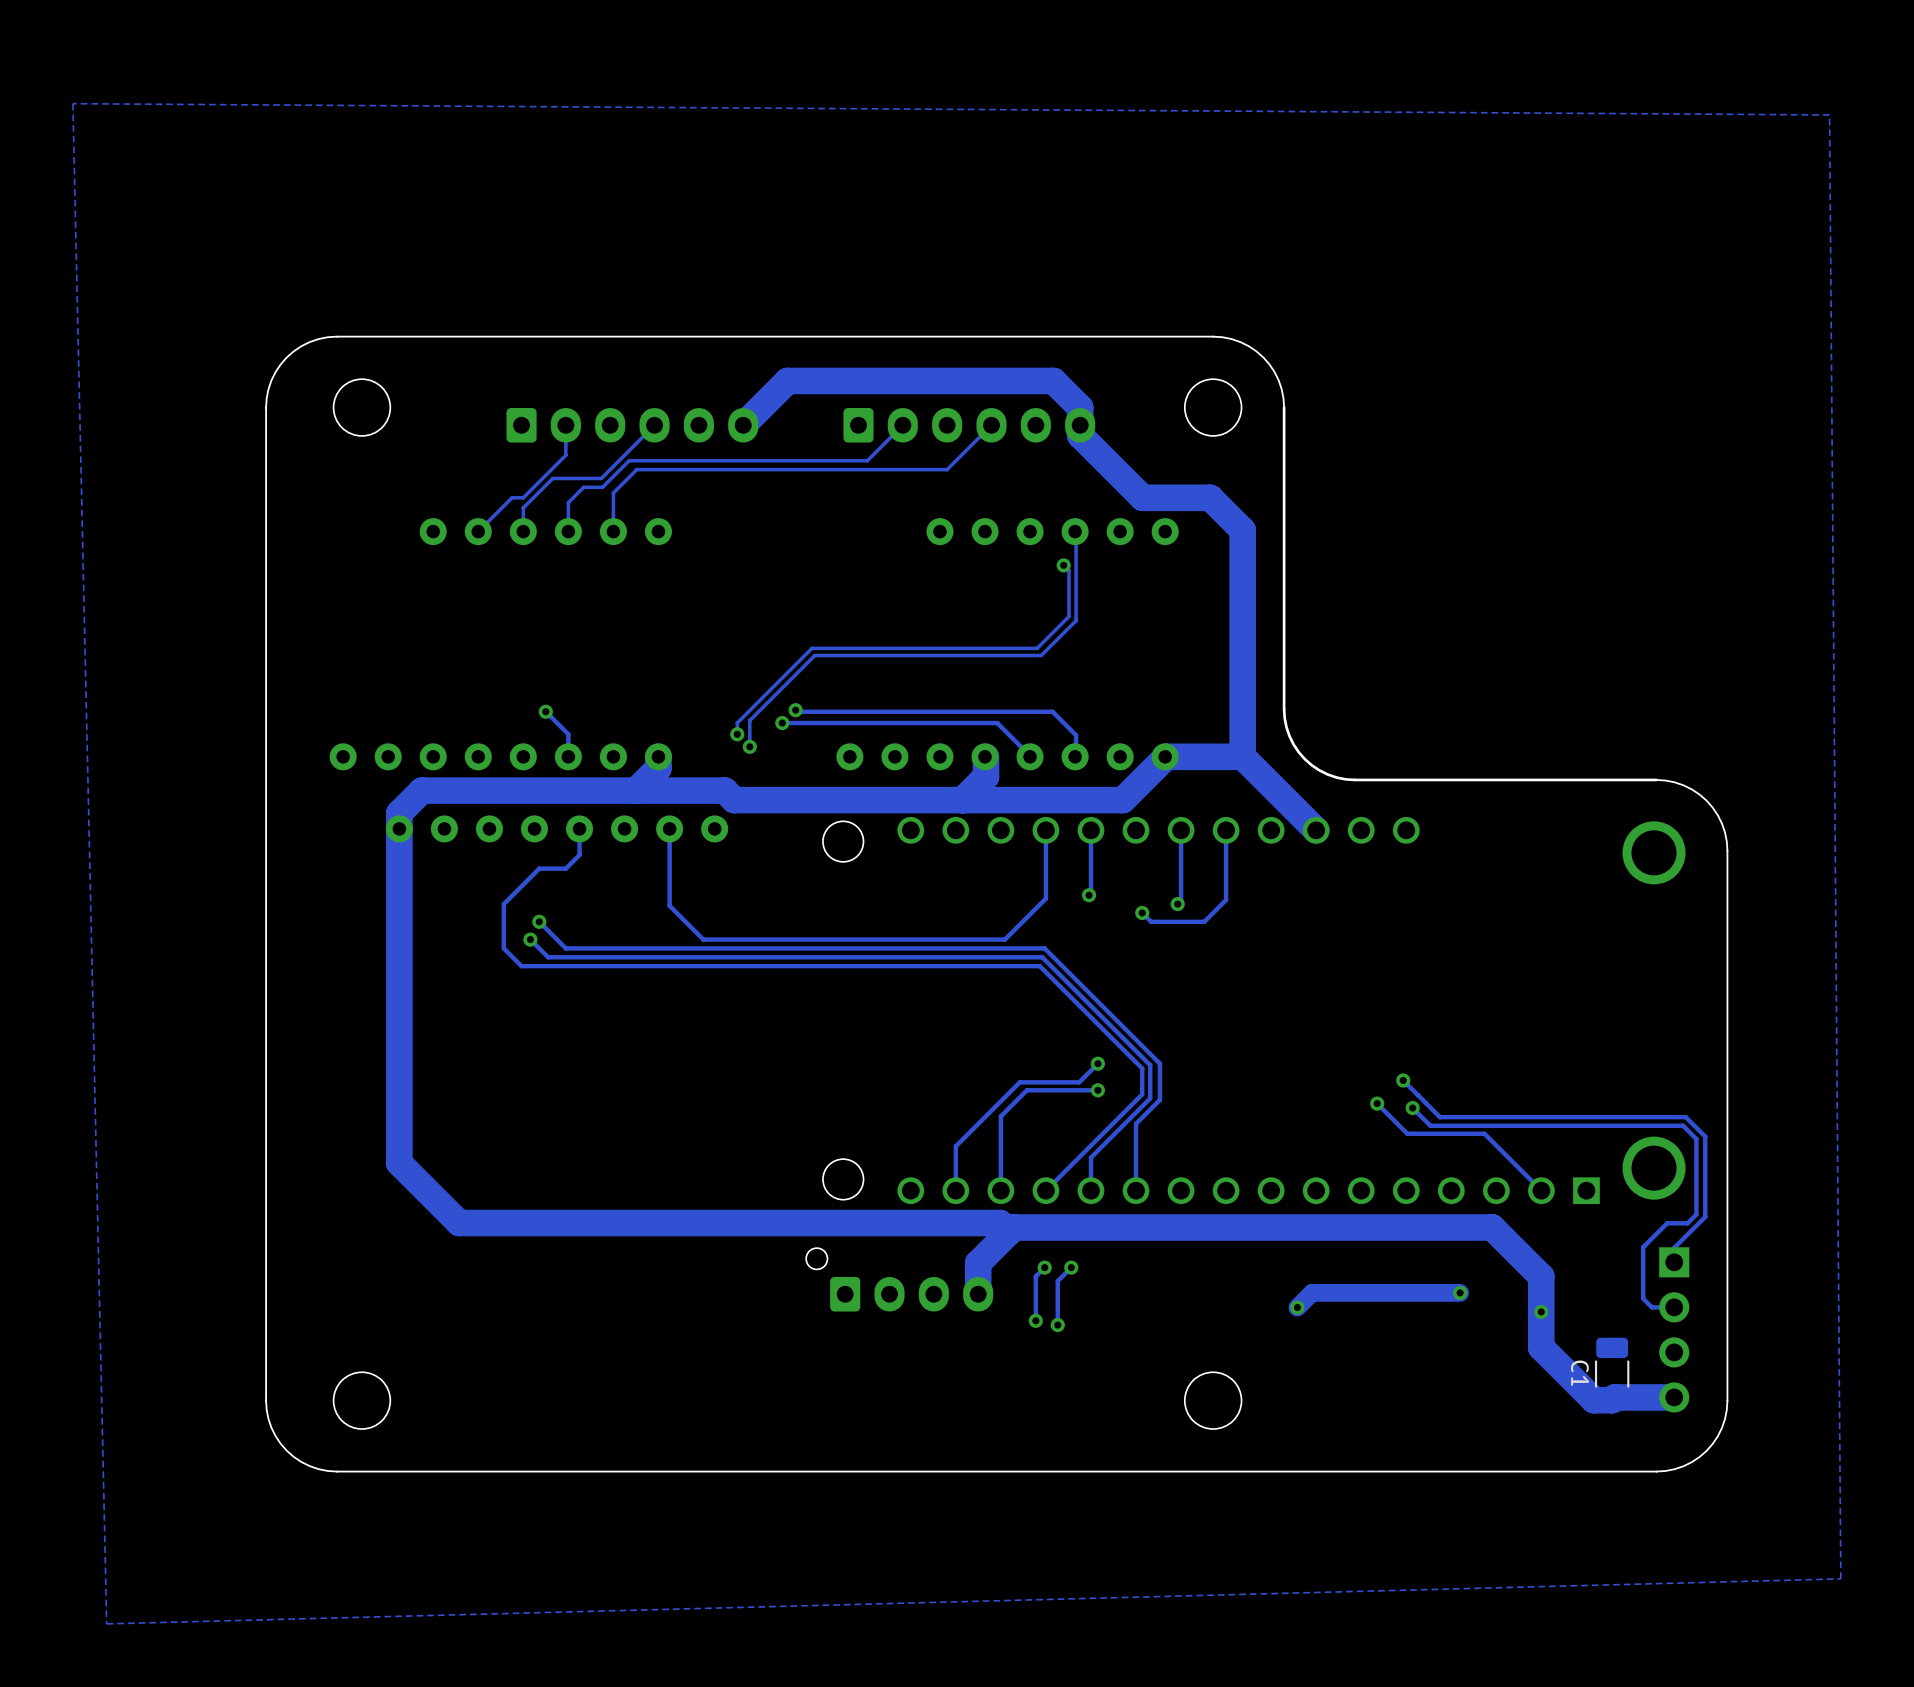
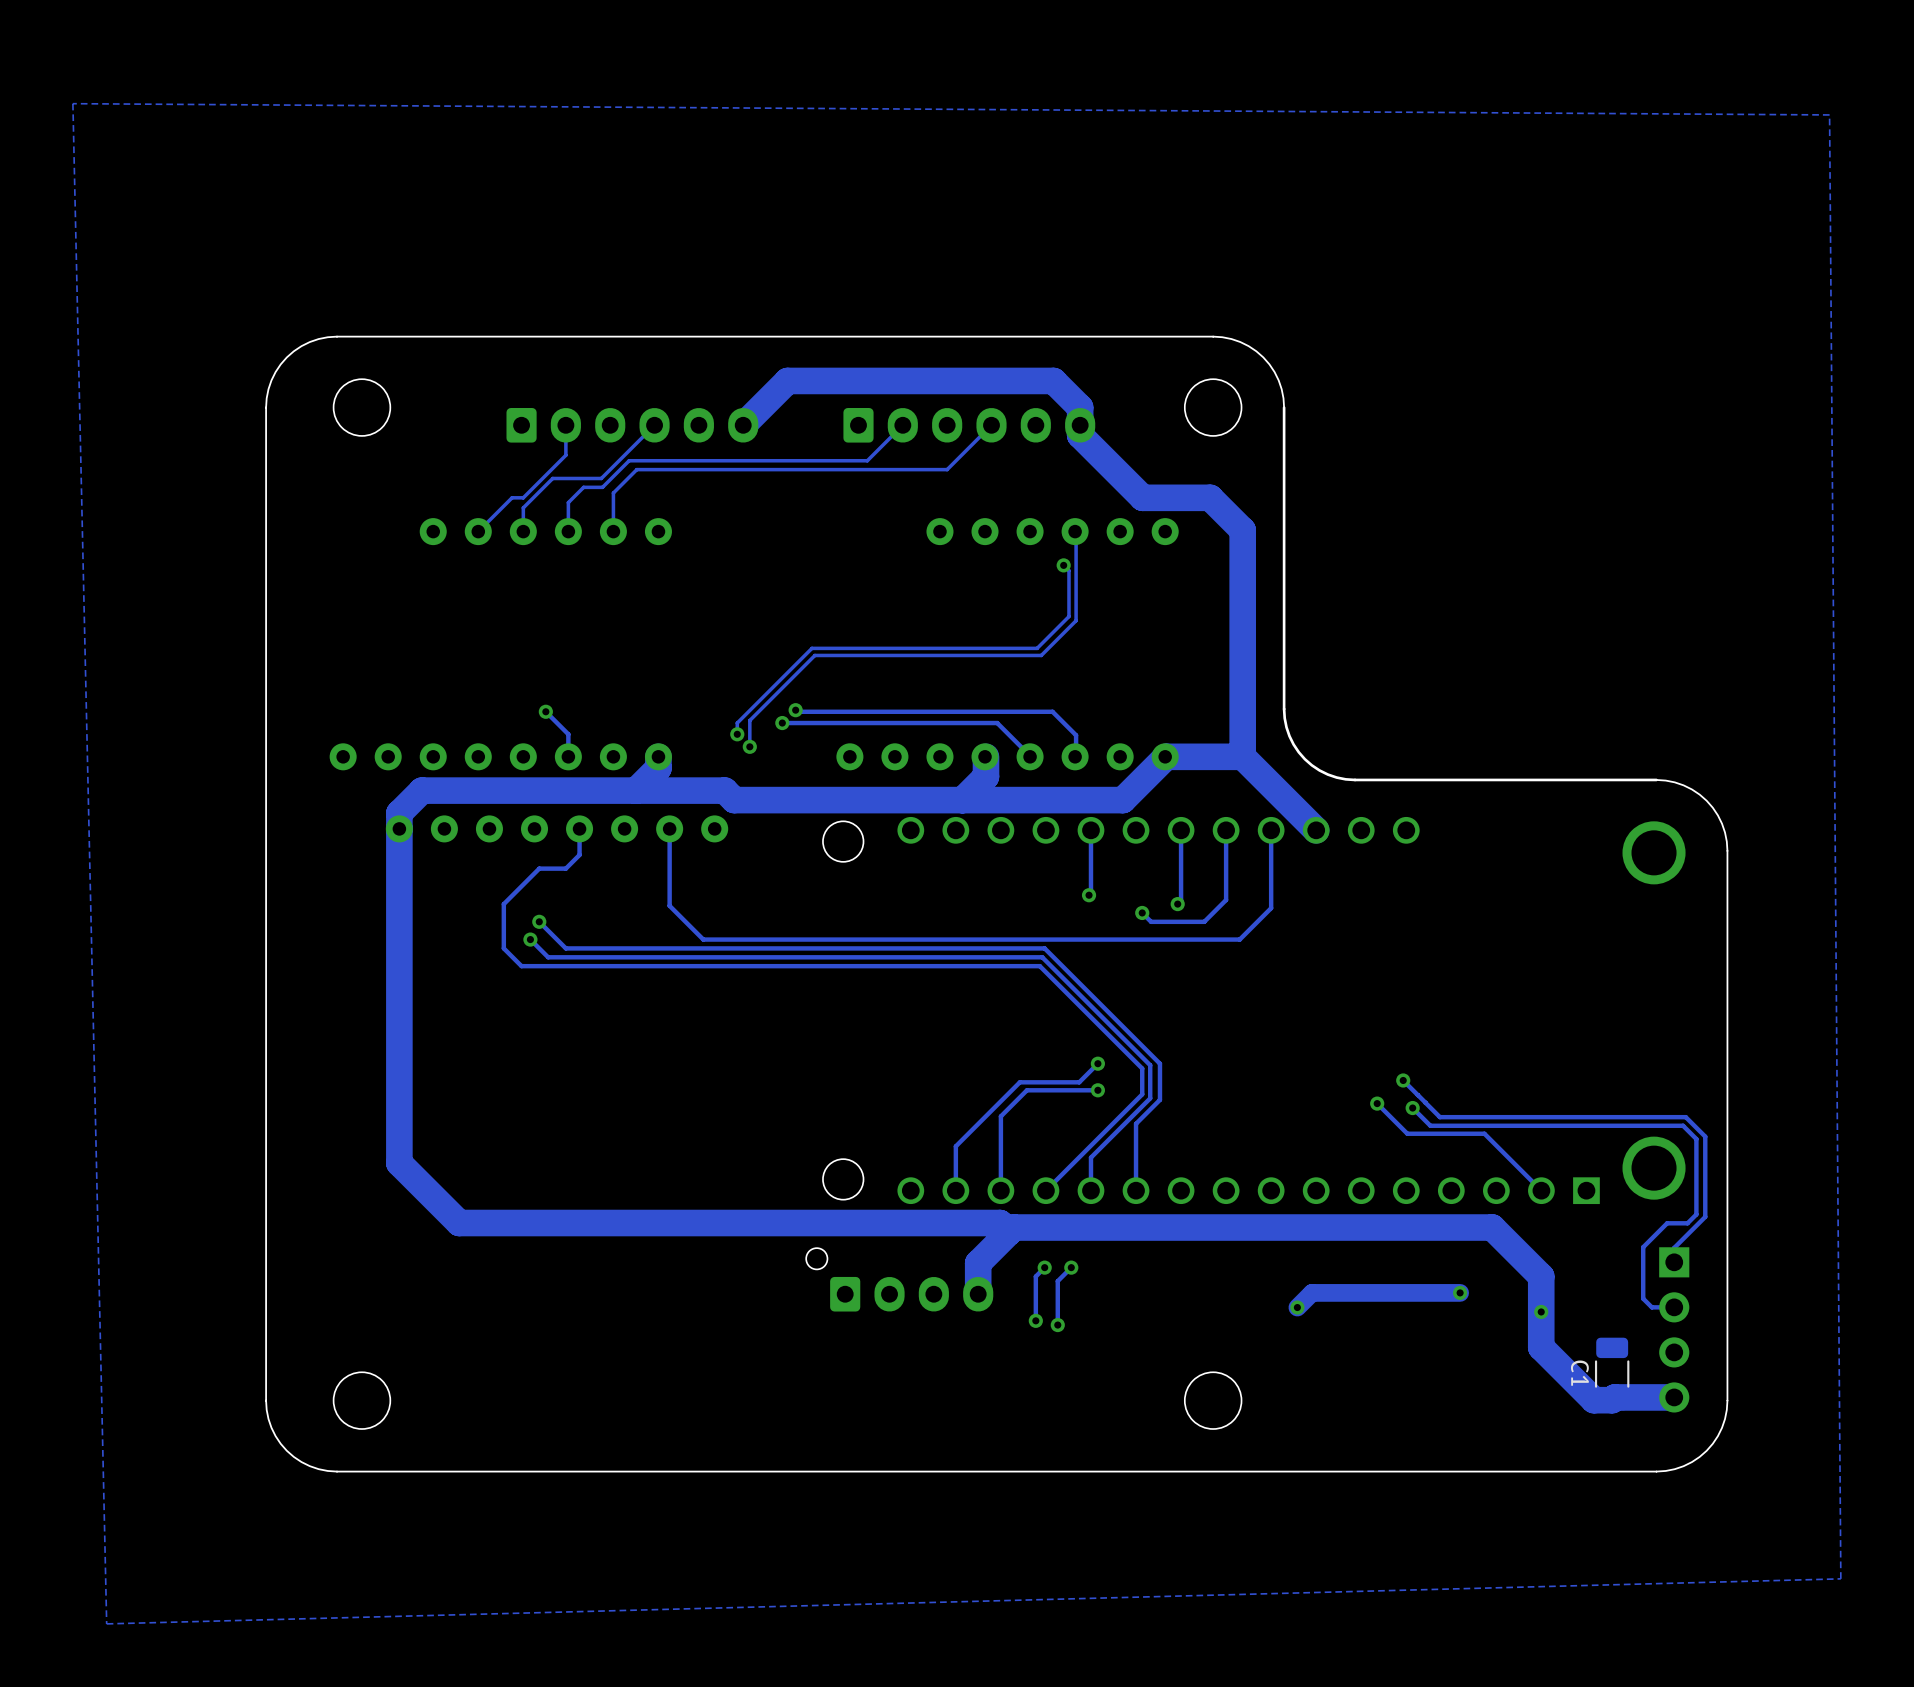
track: (1045, 830) (1045, 898) (1004, 939) -> (1271, 830) (1271, 908) (1239, 939) (1004, 939)

